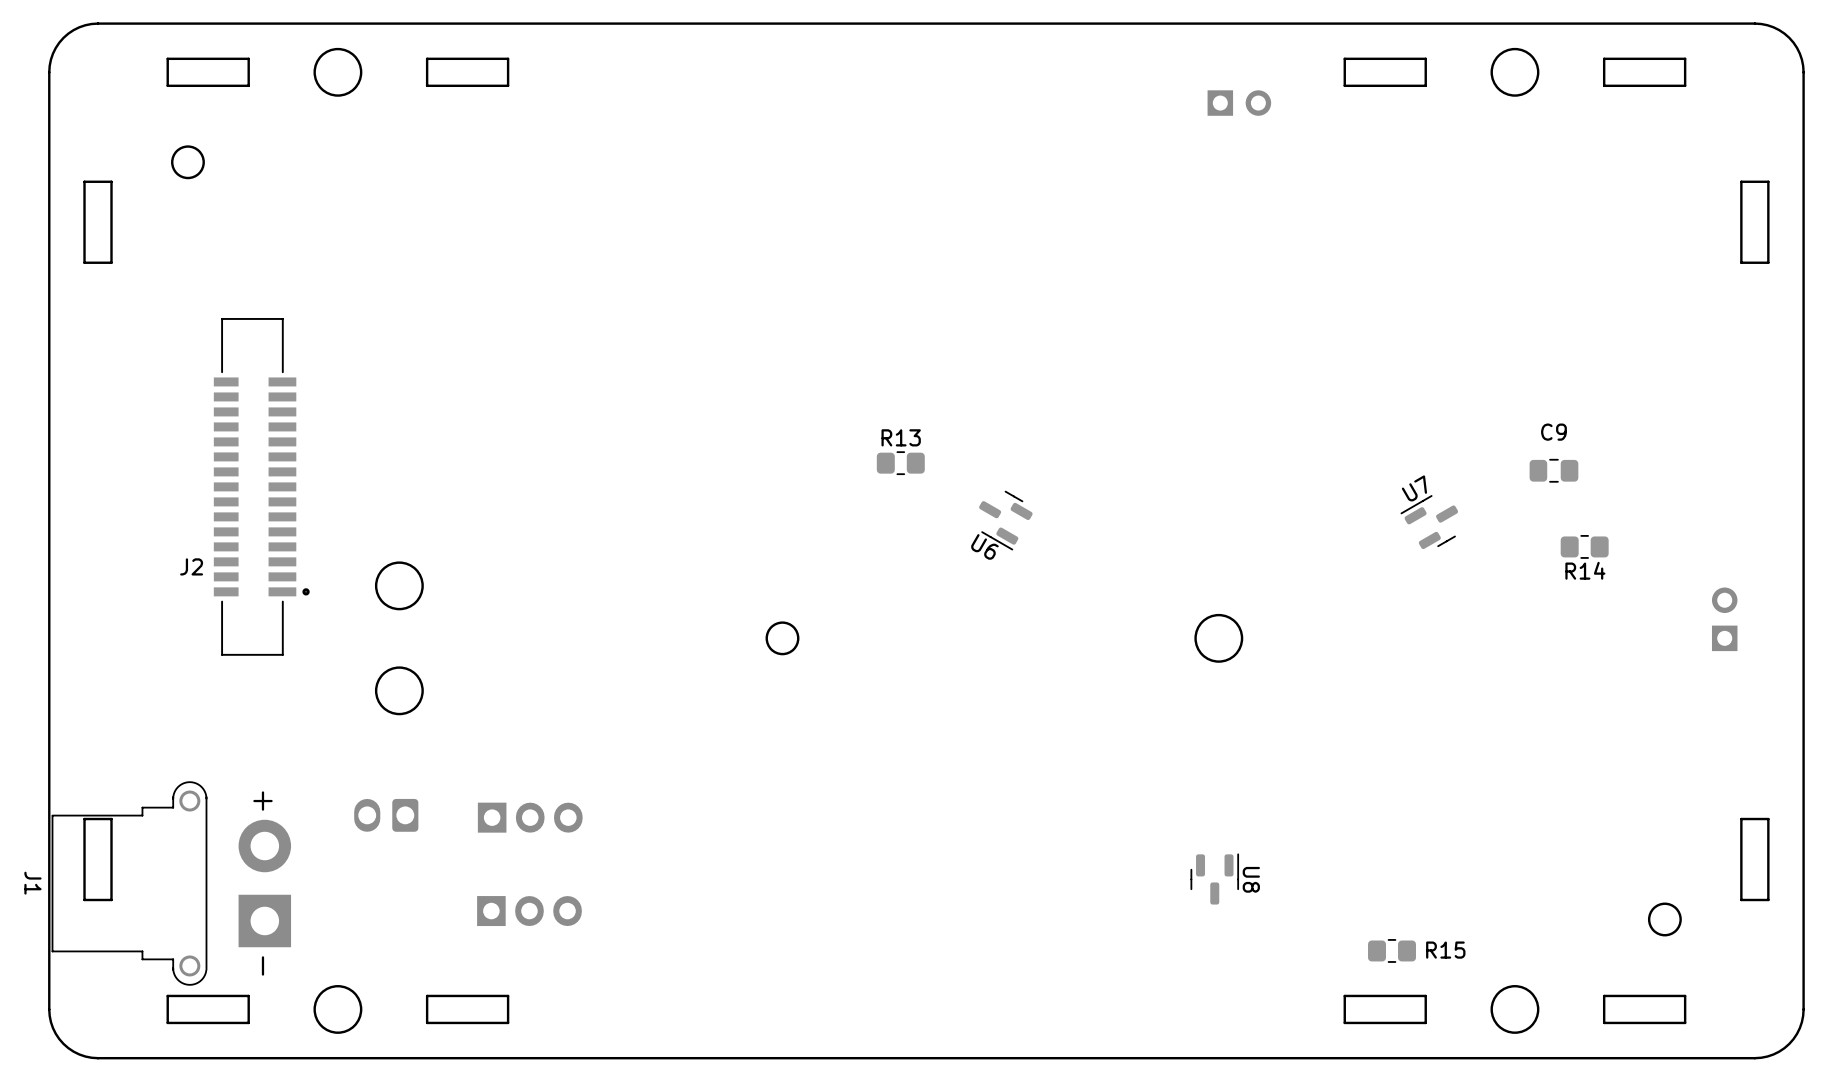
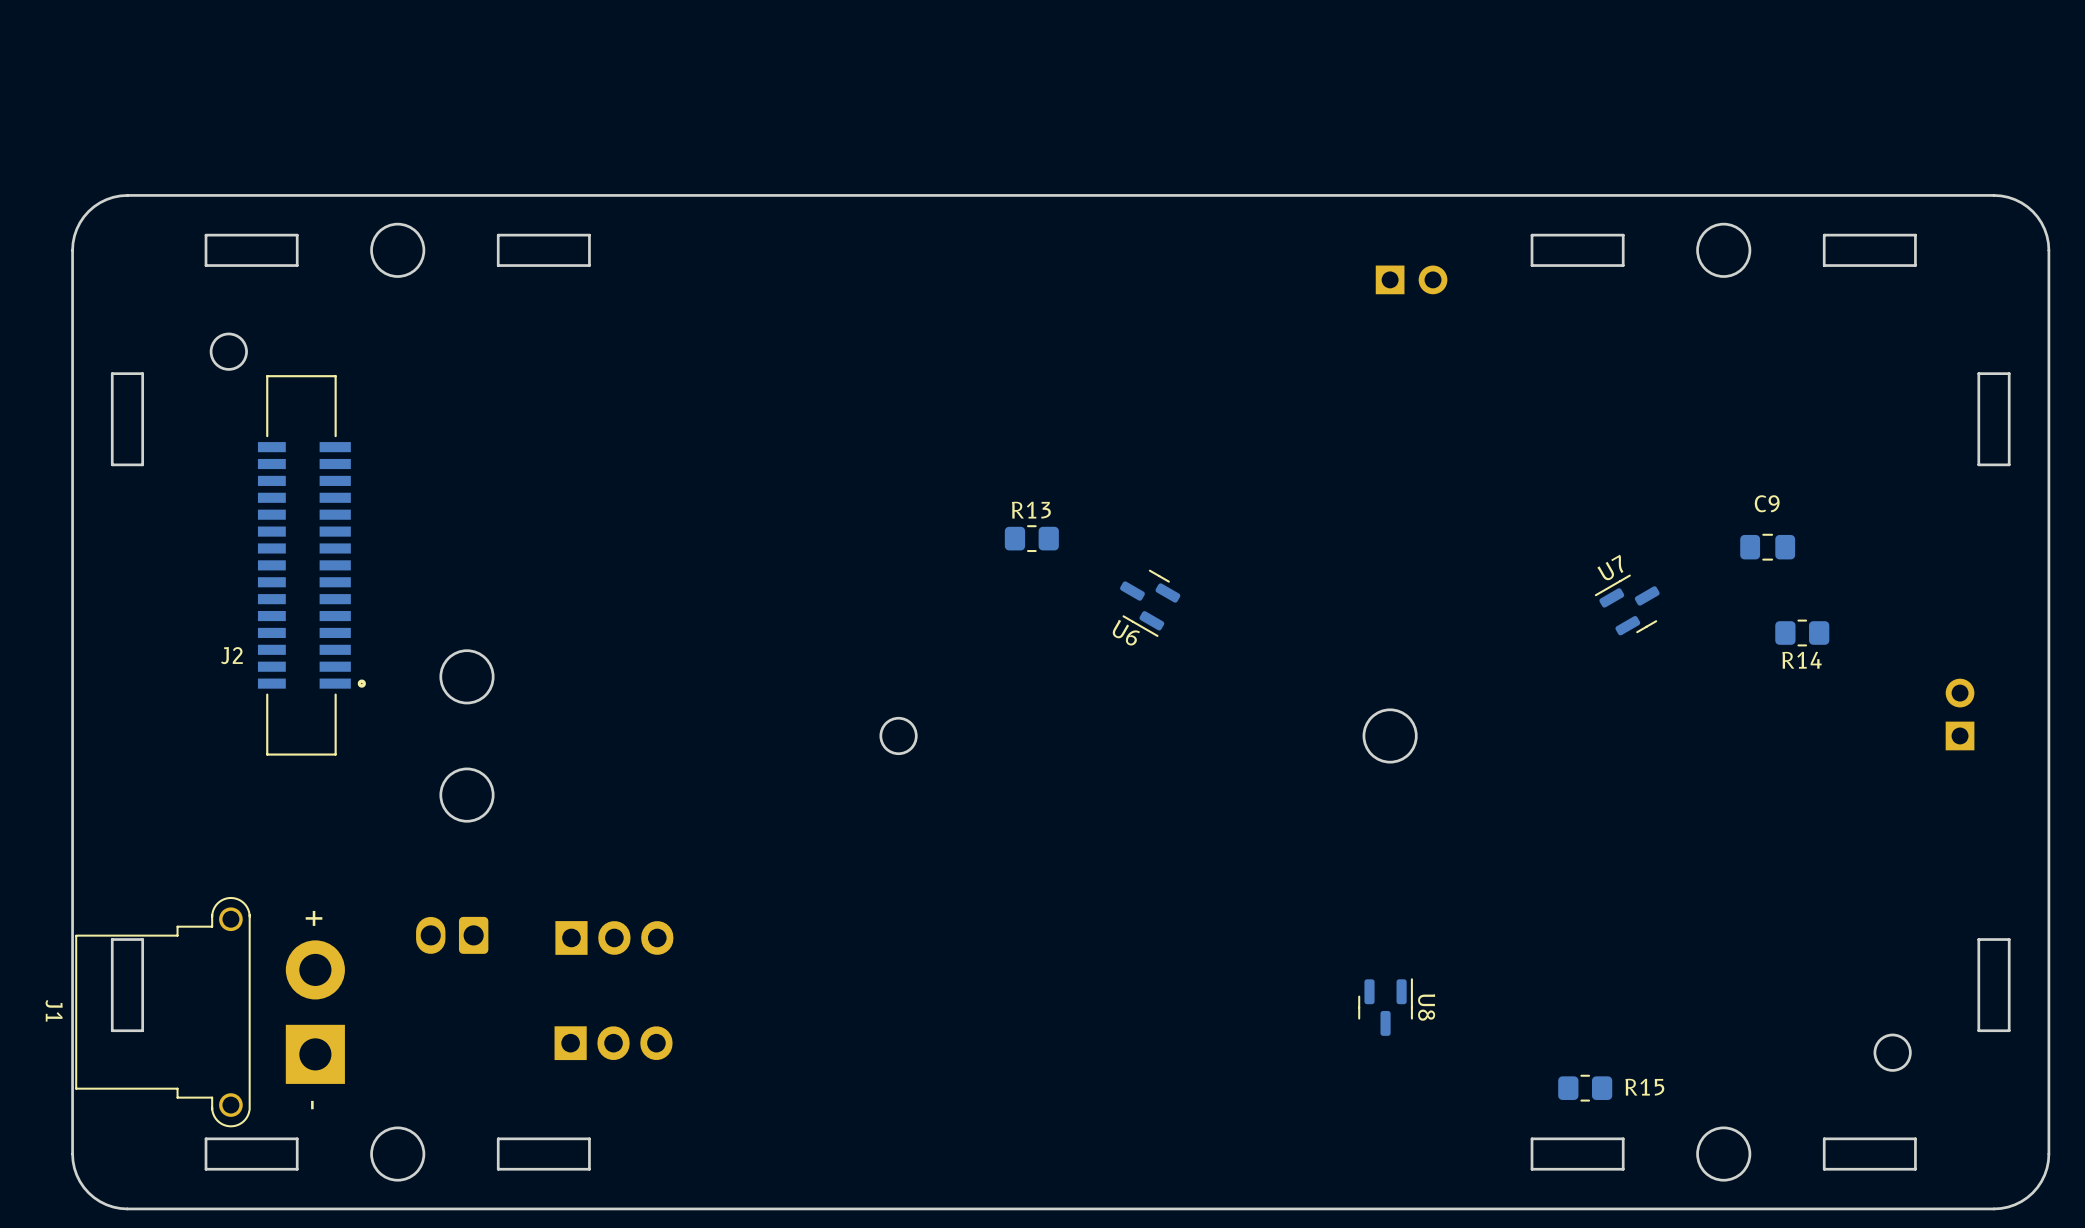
board edge: (248, 58) (248, 85) (167, 85) (167, 58) (248, 58) -> (297, 235) (297, 265) (206, 265) (206, 235) (297, 235)
board edge: (508, 58) (427, 58) (427, 85) (508, 85) (508, 58) -> (589, 235) (498, 235) (498, 265) (589, 265) (589, 235)
board edge: (1425, 58) (1344, 58) (1344, 85) (1425, 85) (1425, 58) -> (1623, 235) (1532, 235) (1532, 265) (1623, 265) (1623, 235)
board edge: (1685, 58) (1604, 58) (1604, 85) (1685, 85) (1685, 58) -> (1915, 235) (1824, 235) (1824, 265) (1915, 265) (1915, 235)
round board edge position: (337, 72) -> (397, 250)
round board edge position: (1514, 72) -> (1723, 250)
part position: (1239, 103) -> (1411, 279)
round board edge position: (187, 162) -> (228, 351)
board edge: (111, 181) (84, 181) (84, 262) (111, 262) (111, 181) -> (142, 373) (112, 373) (112, 464) (142, 464) (142, 373)
board edge: (1768, 181) (1741, 181) (1741, 262) (1768, 262) (1768, 181) -> (2009, 373) (1978, 373) (1978, 464) (2009, 464) (2009, 373)
board edge: (1803, 207) (1803, 72) (1801, 59) (1793, 42) (1784, 33) (1773, 27) (1754, 23) (91, 24) (73, 30) (63, 37) (55, 47) (50, 59) (49, 72) (49, 207) -> (2048, 250) (2044, 229) (2032, 211) (2015, 199) (1993, 195) (127, 195) (106, 199) (88, 211) (76, 229) (72, 250)

